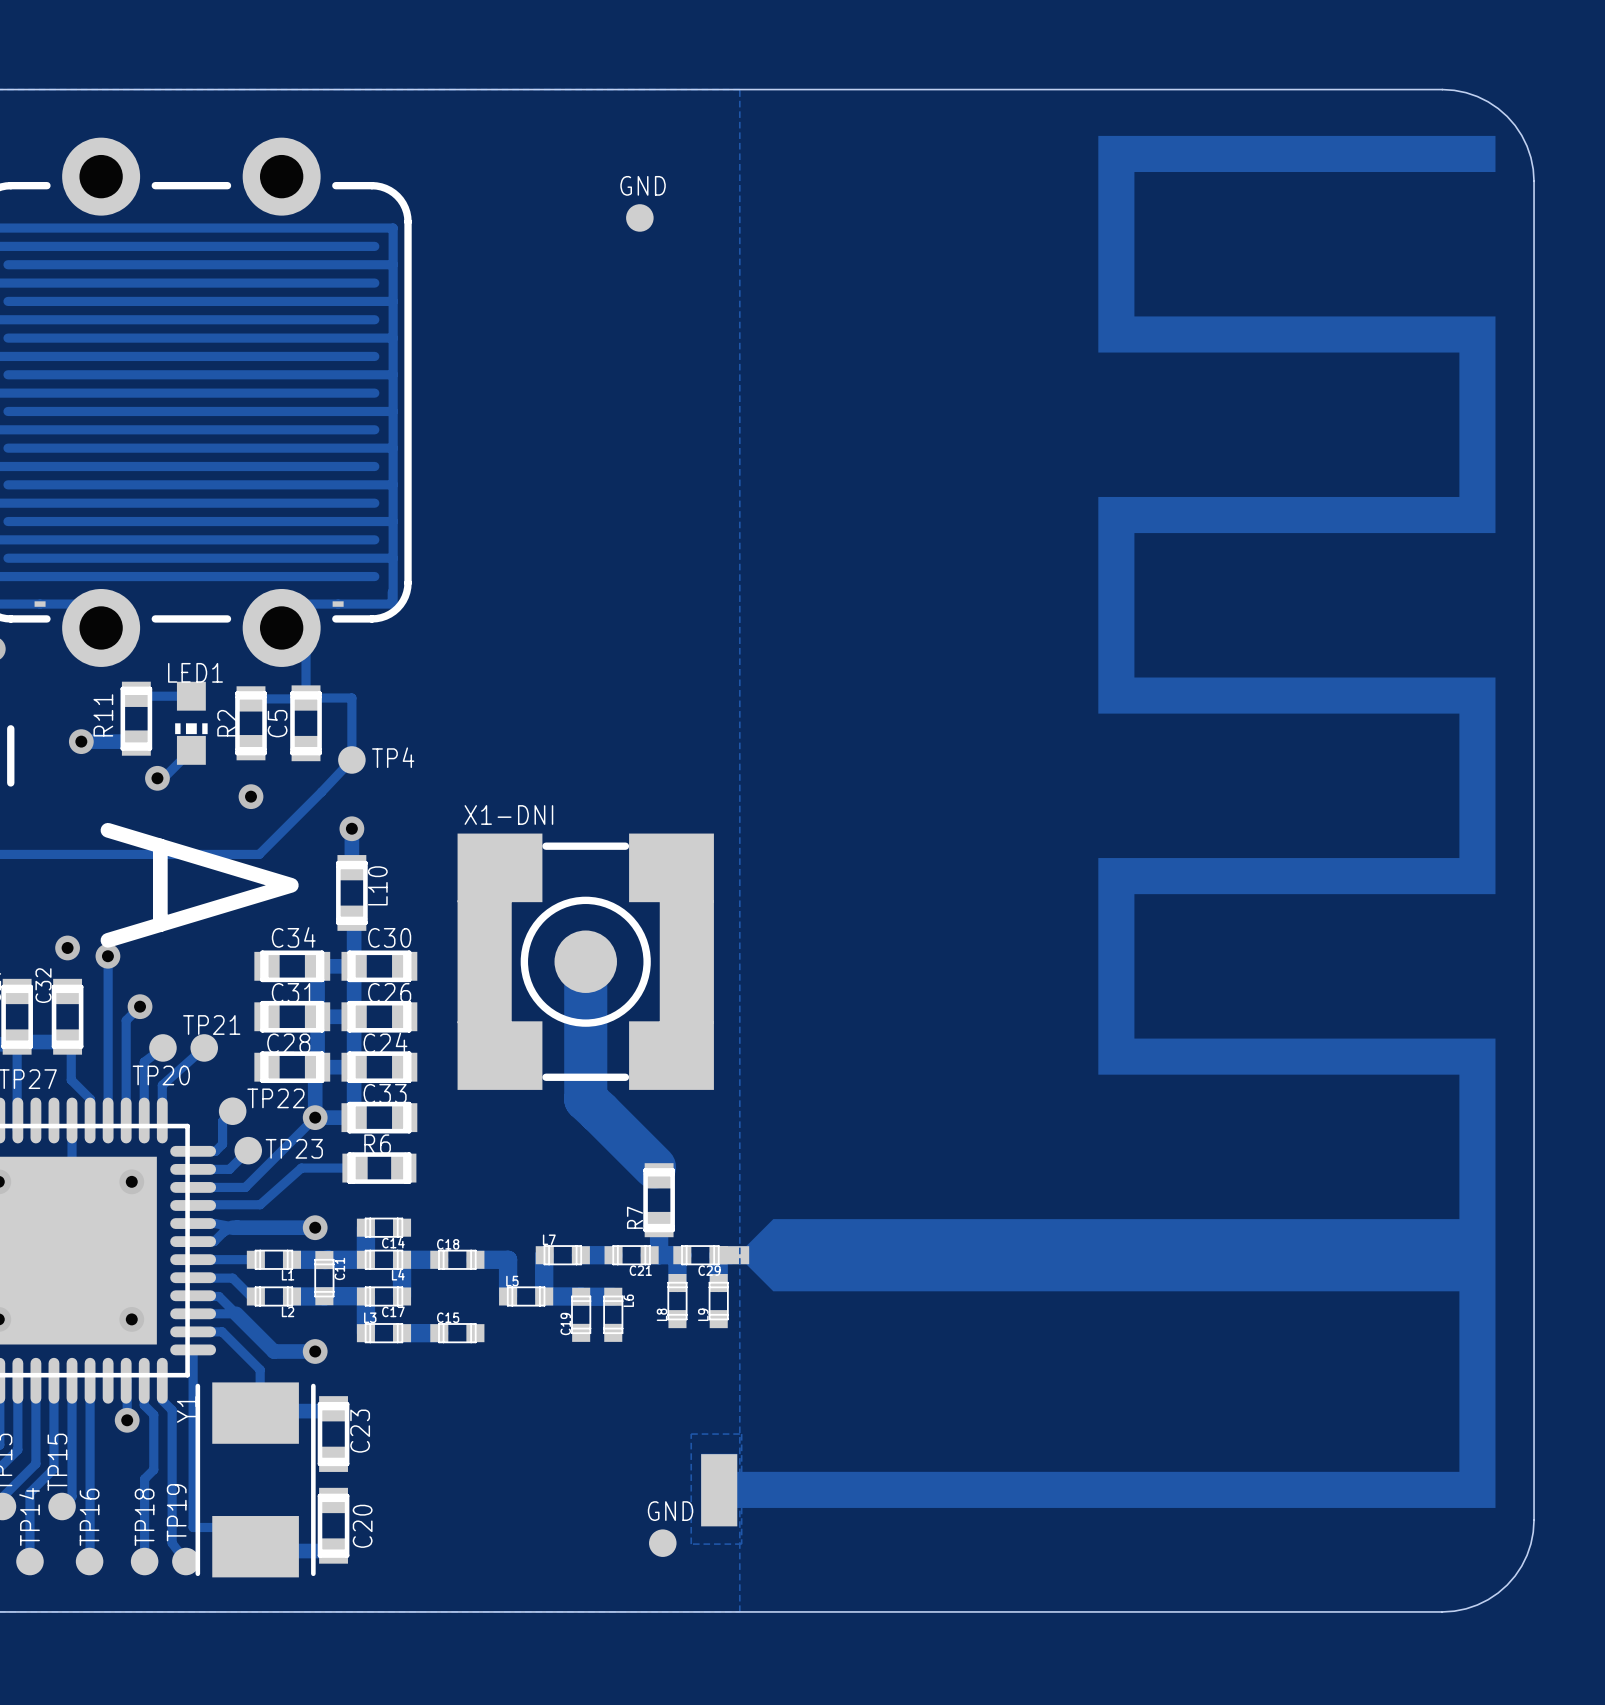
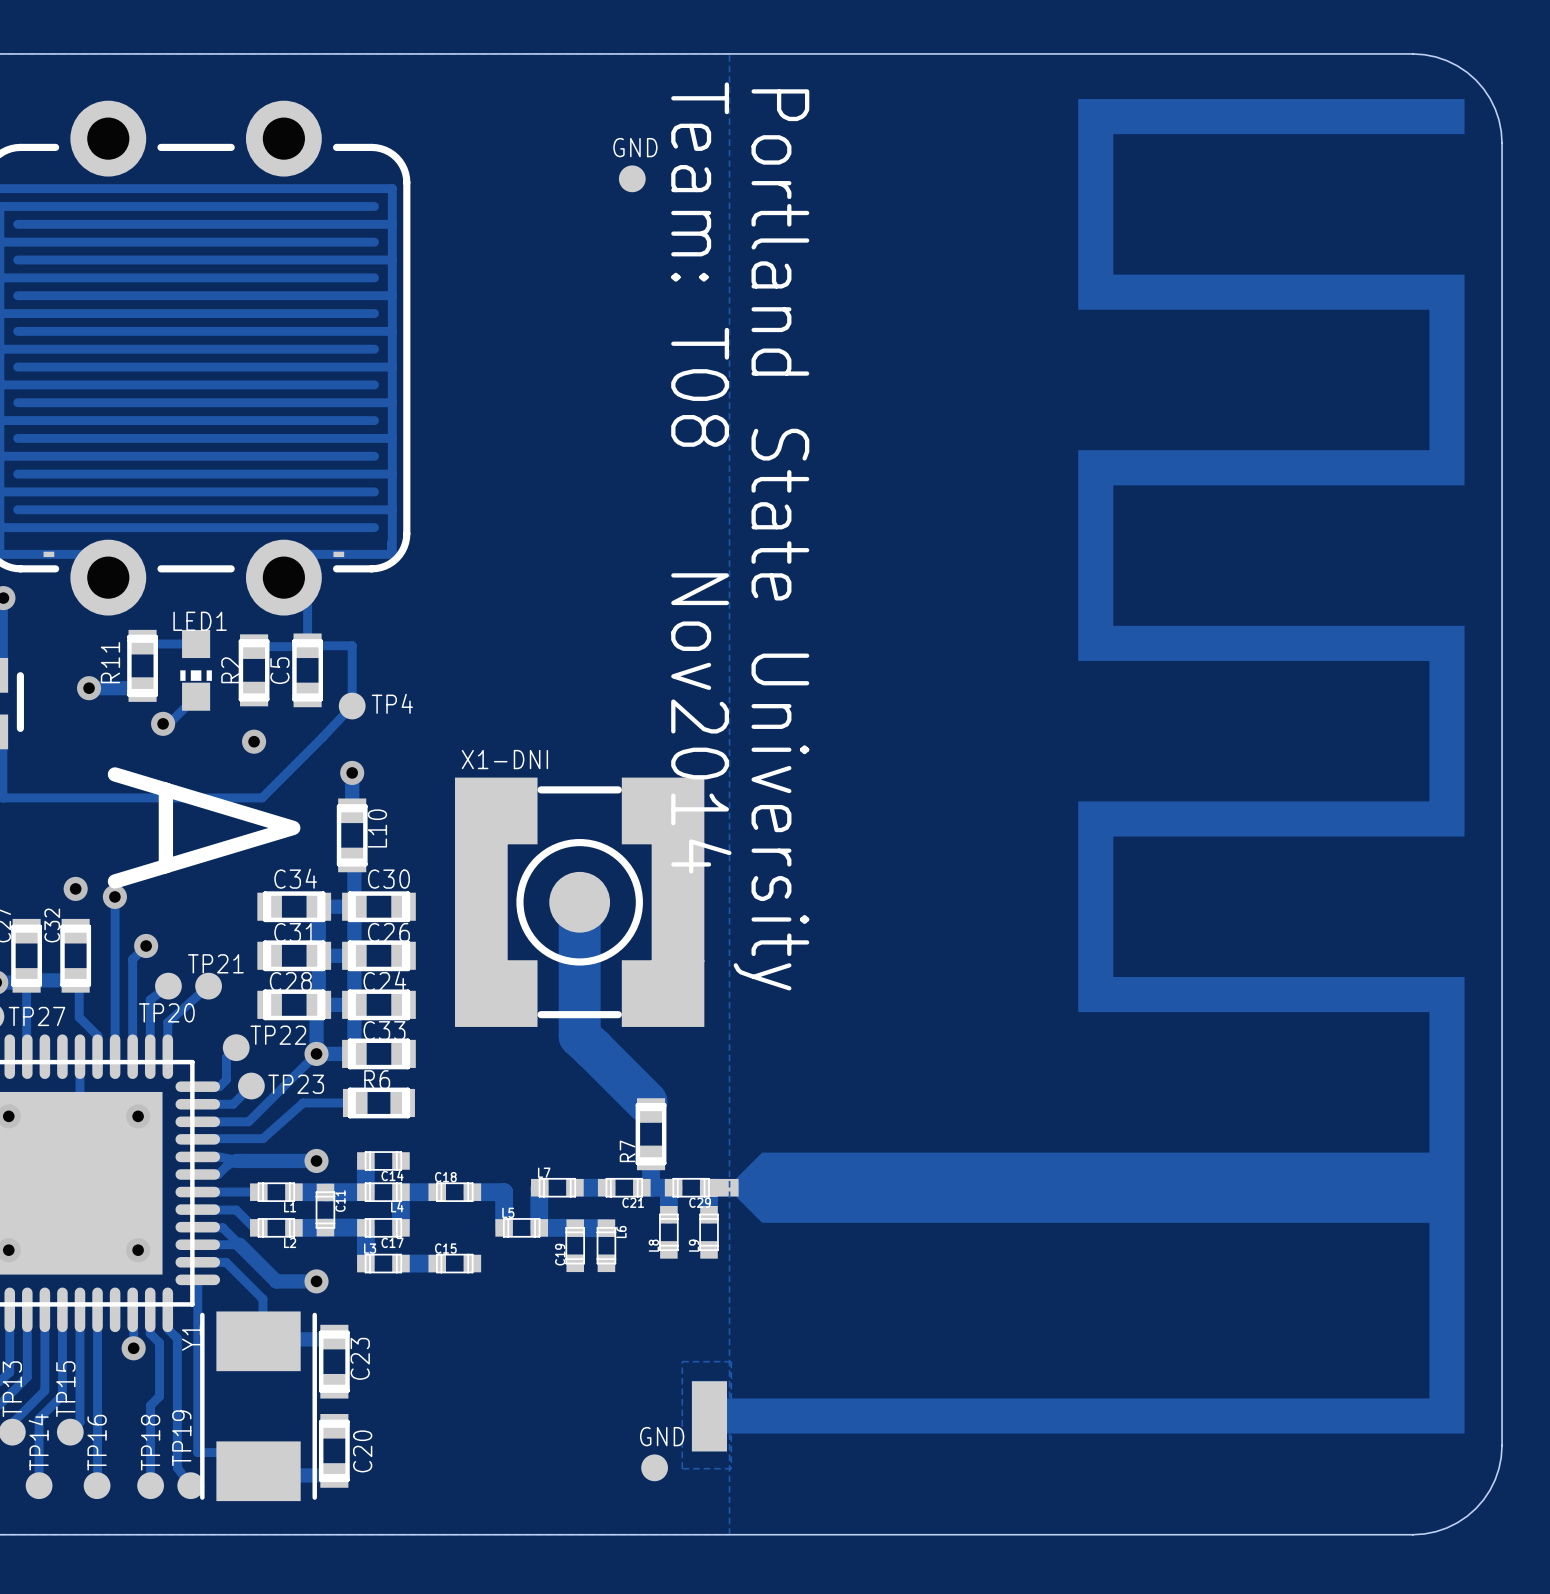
text: none -> Team: T08 Nov2014 (701, 477)
text: none -> Portland State University (771, 539)

